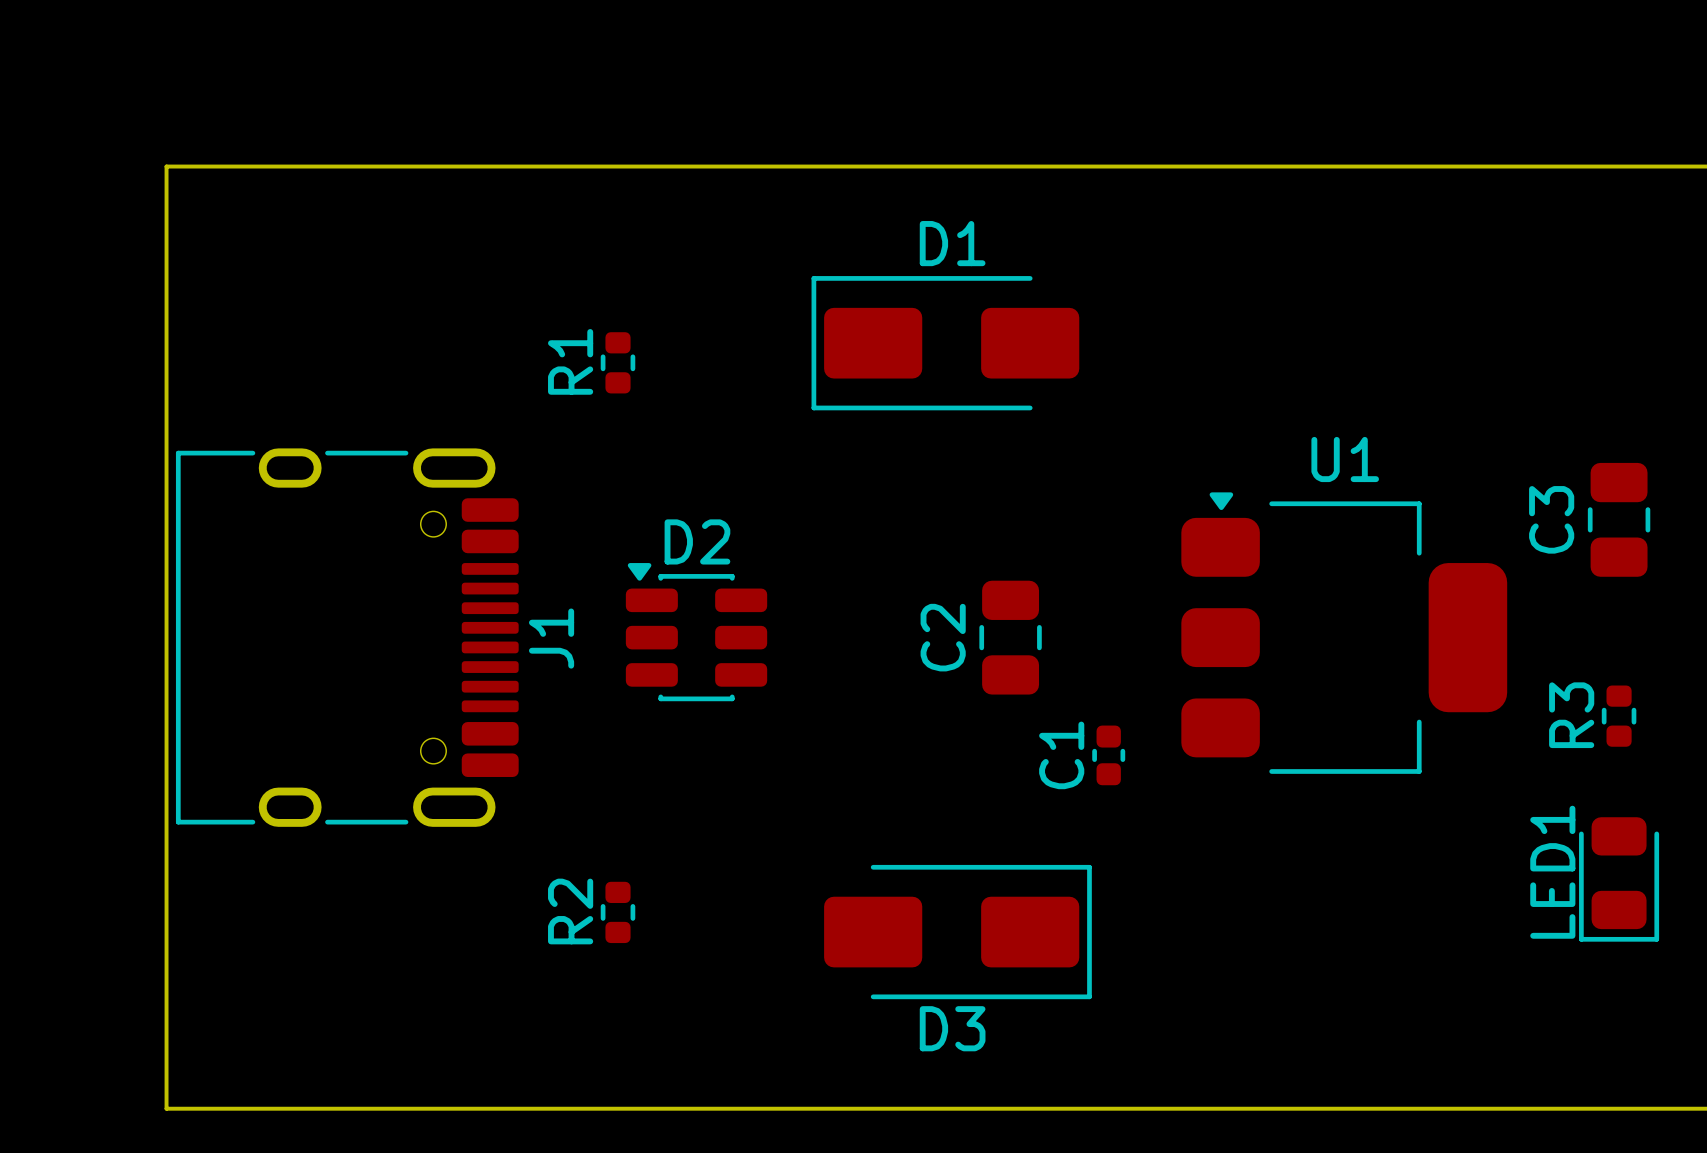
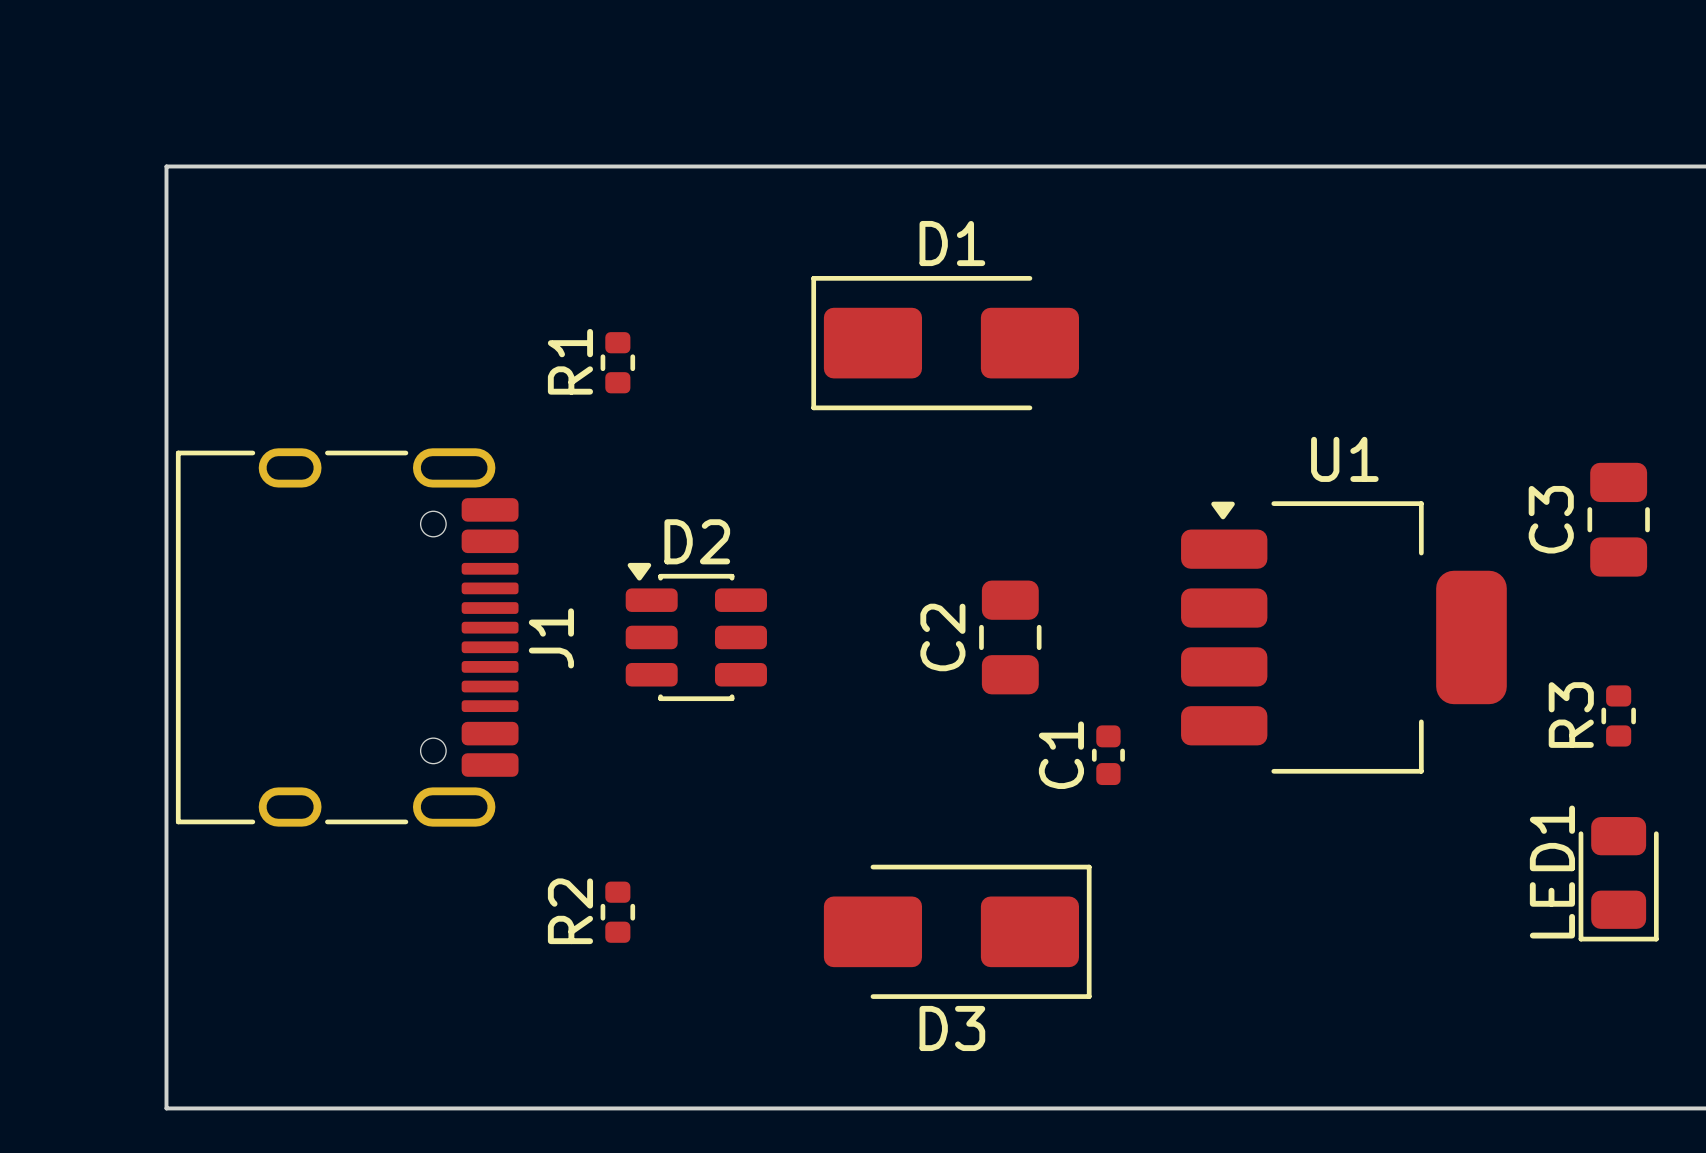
U1 footprint: [1181, 492, 1508, 774] -> [1181, 501, 1507, 774]

